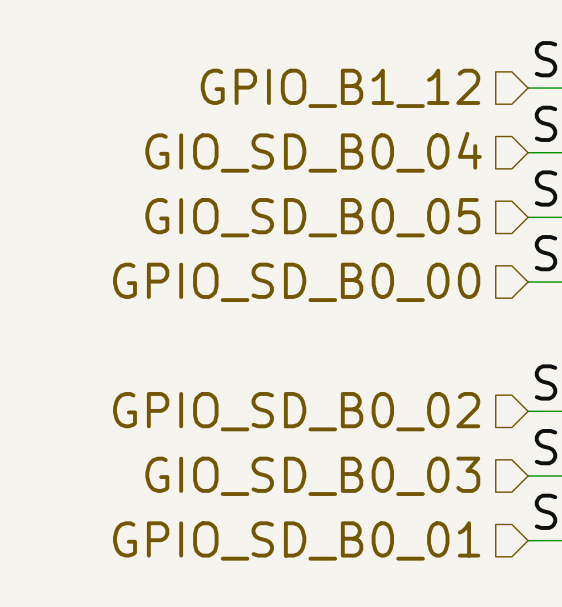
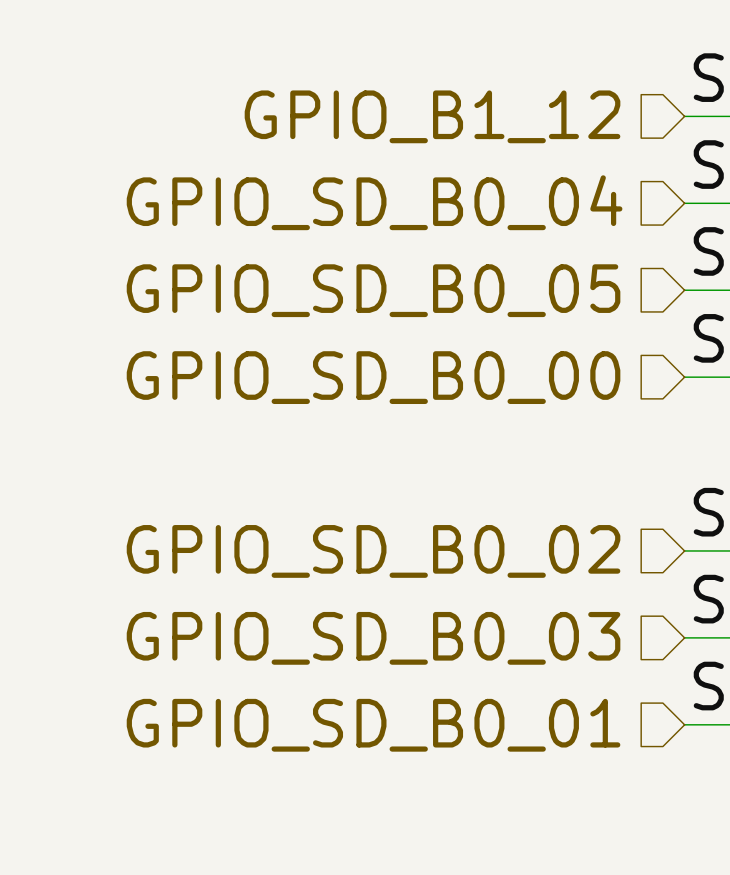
hierarchical label: GIO_SD_B0_04 (313, 152) -> GPIO_SD_B0_04 (374, 202)
hierarchical label: GIO_SD_B0_05 (312, 217) -> GPIO_SD_B0_05 (373, 290)
hierarchical label: GIO_SD_B0_03 (312, 476) -> GPIO_SD_B0_03 (373, 638)

